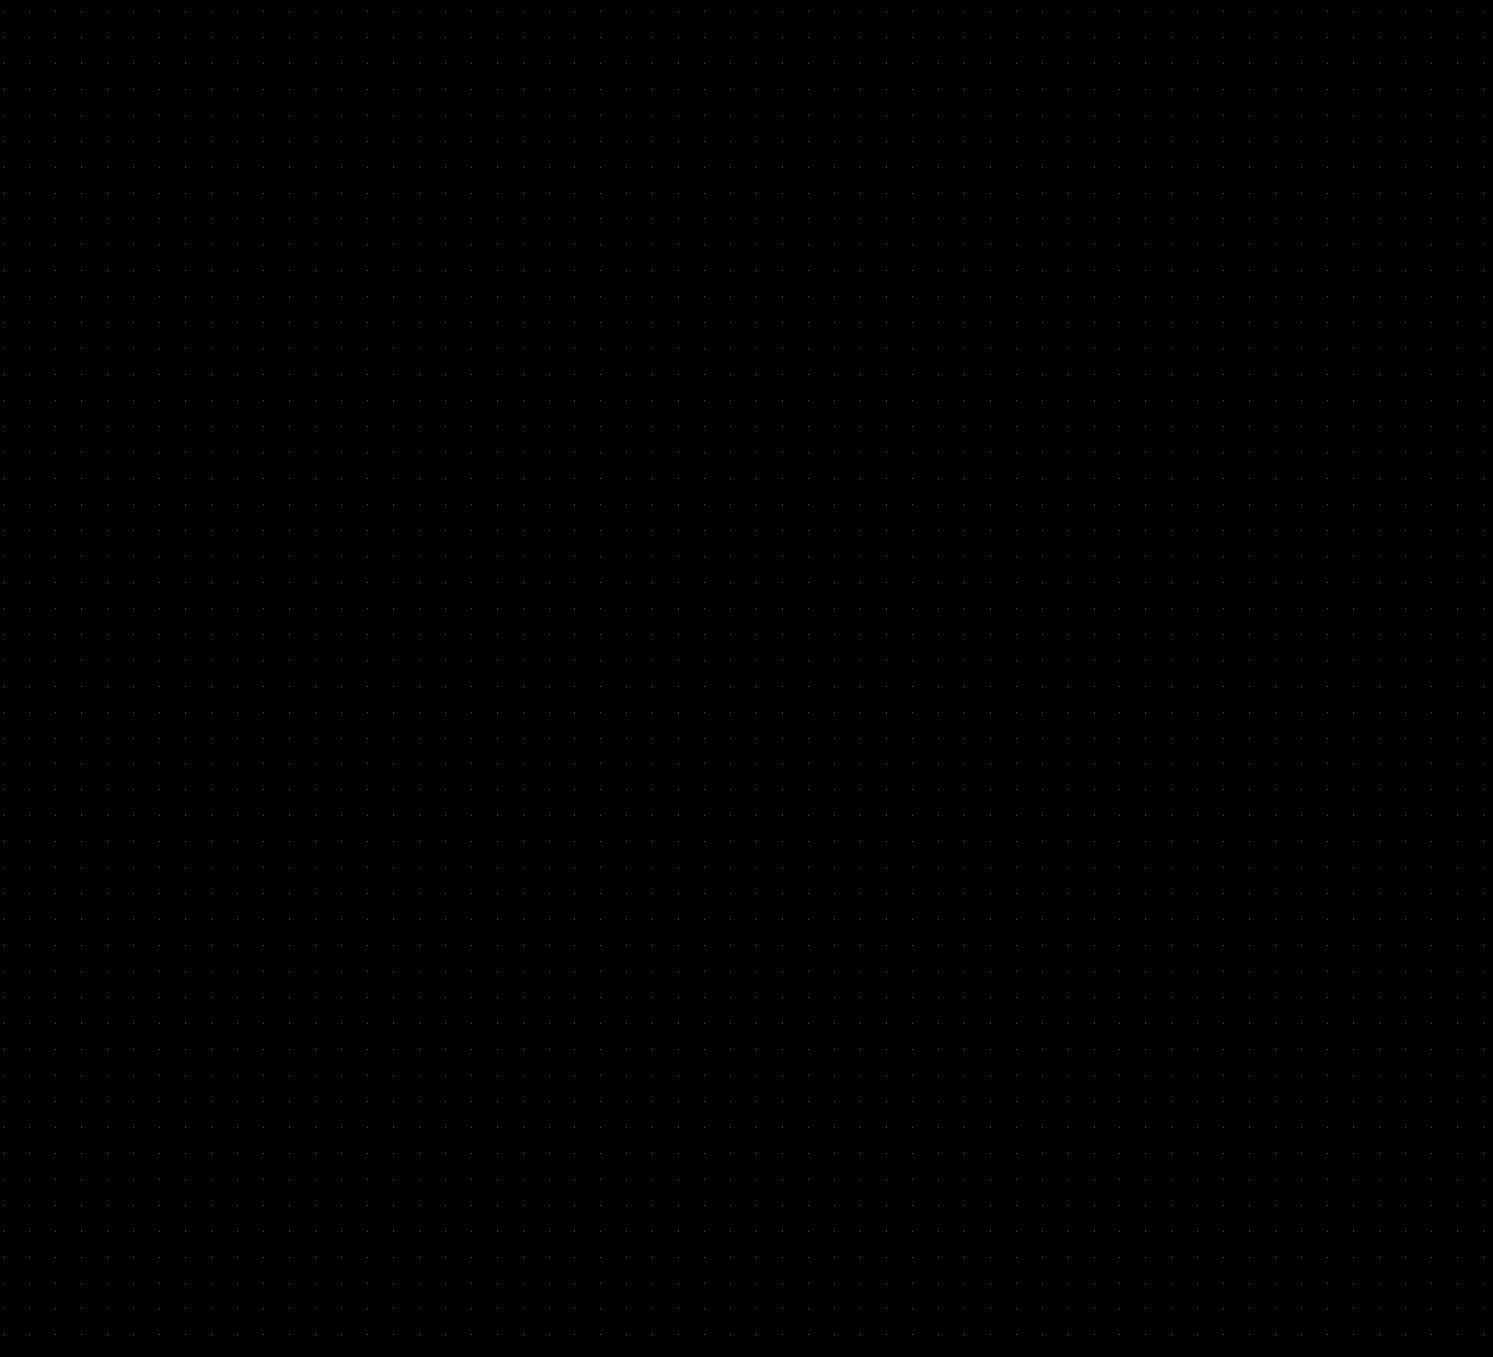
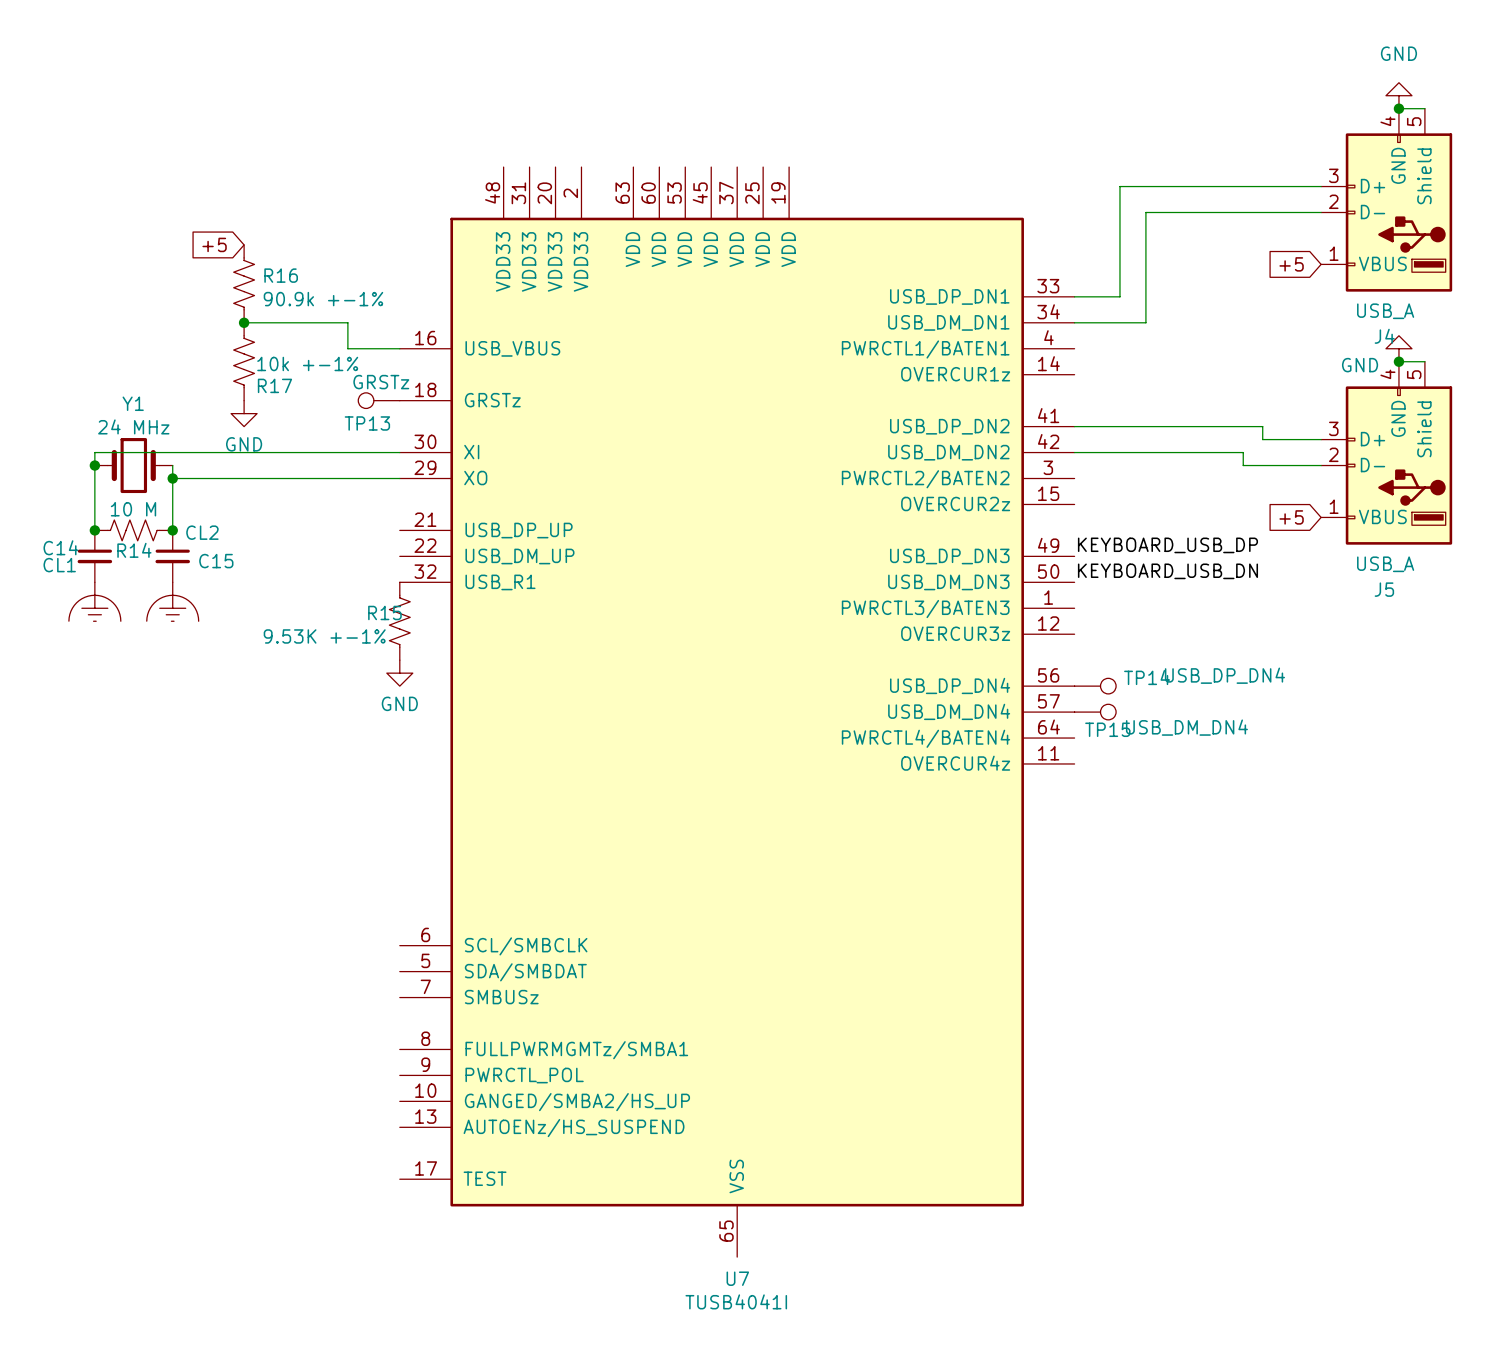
power symbol: none -> GND (1398, 95)
wire: none -> (1398, 108) (1424, 108)
junction: none -> (1398, 108)
wire: none -> (1321, 186) (1119, 186) (1119, 296) (1074, 296)
J4: none -> USB_A (1386, 200)
wire: none -> (1321, 212) (1145, 212) (1145, 322) (1074, 322)
global label: none -> +5 (214, 244)
global label: none -> +5 (1291, 264)
R16: none -> 90.9k +-1% (244, 283)
wire: none -> (244, 322) (347, 322) (347, 348) (399, 348)
junction: none -> (244, 322)
power symbol: none -> GND (1398, 348)
R17: none -> 10k +-1% (244, 361)
wire: none -> (1398, 361) (1424, 361)
junction: none -> (1398, 361)
TP13: none -> GRSTz (379, 400)
power symbol: none -> GND (244, 413)
wire: none -> (1074, 426) (1262, 426) (1262, 439) (1321, 439)
wire: none -> (399, 452) (94, 452) (94, 530)
wire: none -> (1074, 452) (1243, 452) (1243, 465) (1321, 465)
J5: none -> USB_A (1386, 453)
junction: none -> (94, 465)
Y1: none -> 24 MHz (133, 465)
wire: none -> (172, 465) (172, 530)
wire: none -> (172, 478) (399, 478)
junction: none -> (172, 478)
global label: none -> +5 (1291, 517)
junction: none -> (94, 530)
R14: none -> 10 M (133, 530)
junction: none -> (172, 530)
label: none -> KEYBOARD_USB_DP (1167, 545)
C14: none -> CL1 (94, 556)
C15: none -> CL2 (172, 556)
label: none -> KEYBOARD_USB_DN (1167, 571)
power symbol: none -> (94, 601)
power symbol: none -> (172, 601)
R15: none -> 9.53K +-1% (399, 621)
power symbol: none -> GND (399, 673)
TP14: none -> USB_DP_DN4 (1095, 686)
U7: none -> TUSB4041I (737, 712)
TP15: none -> USB_DM_DN4 (1095, 712)

